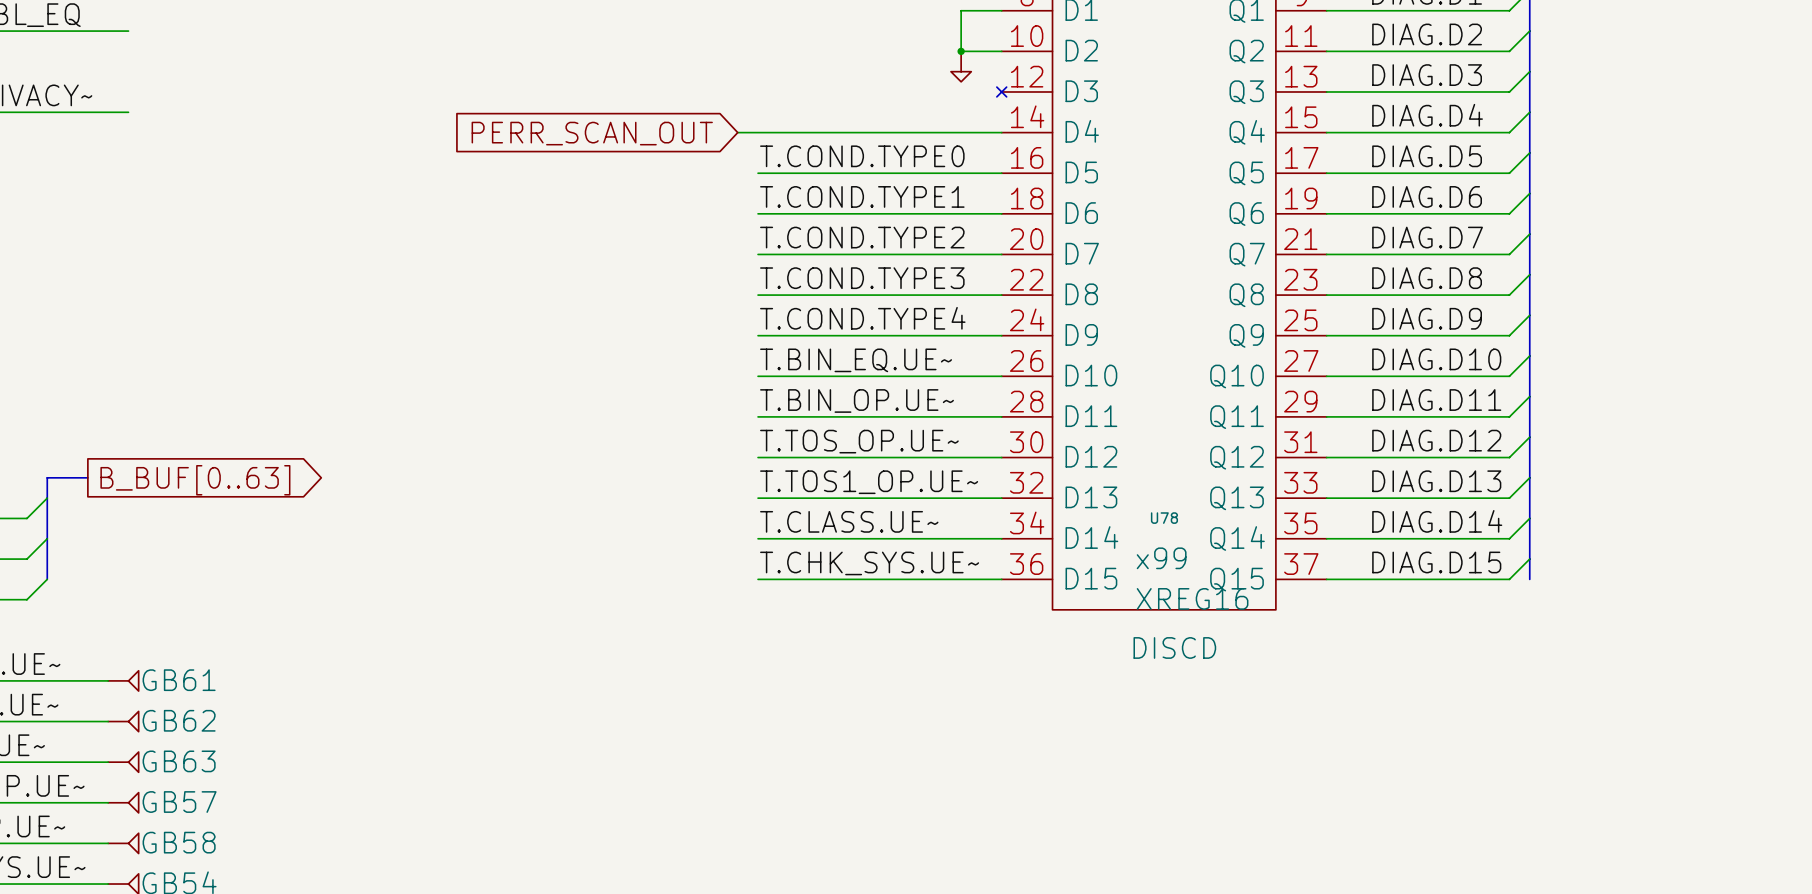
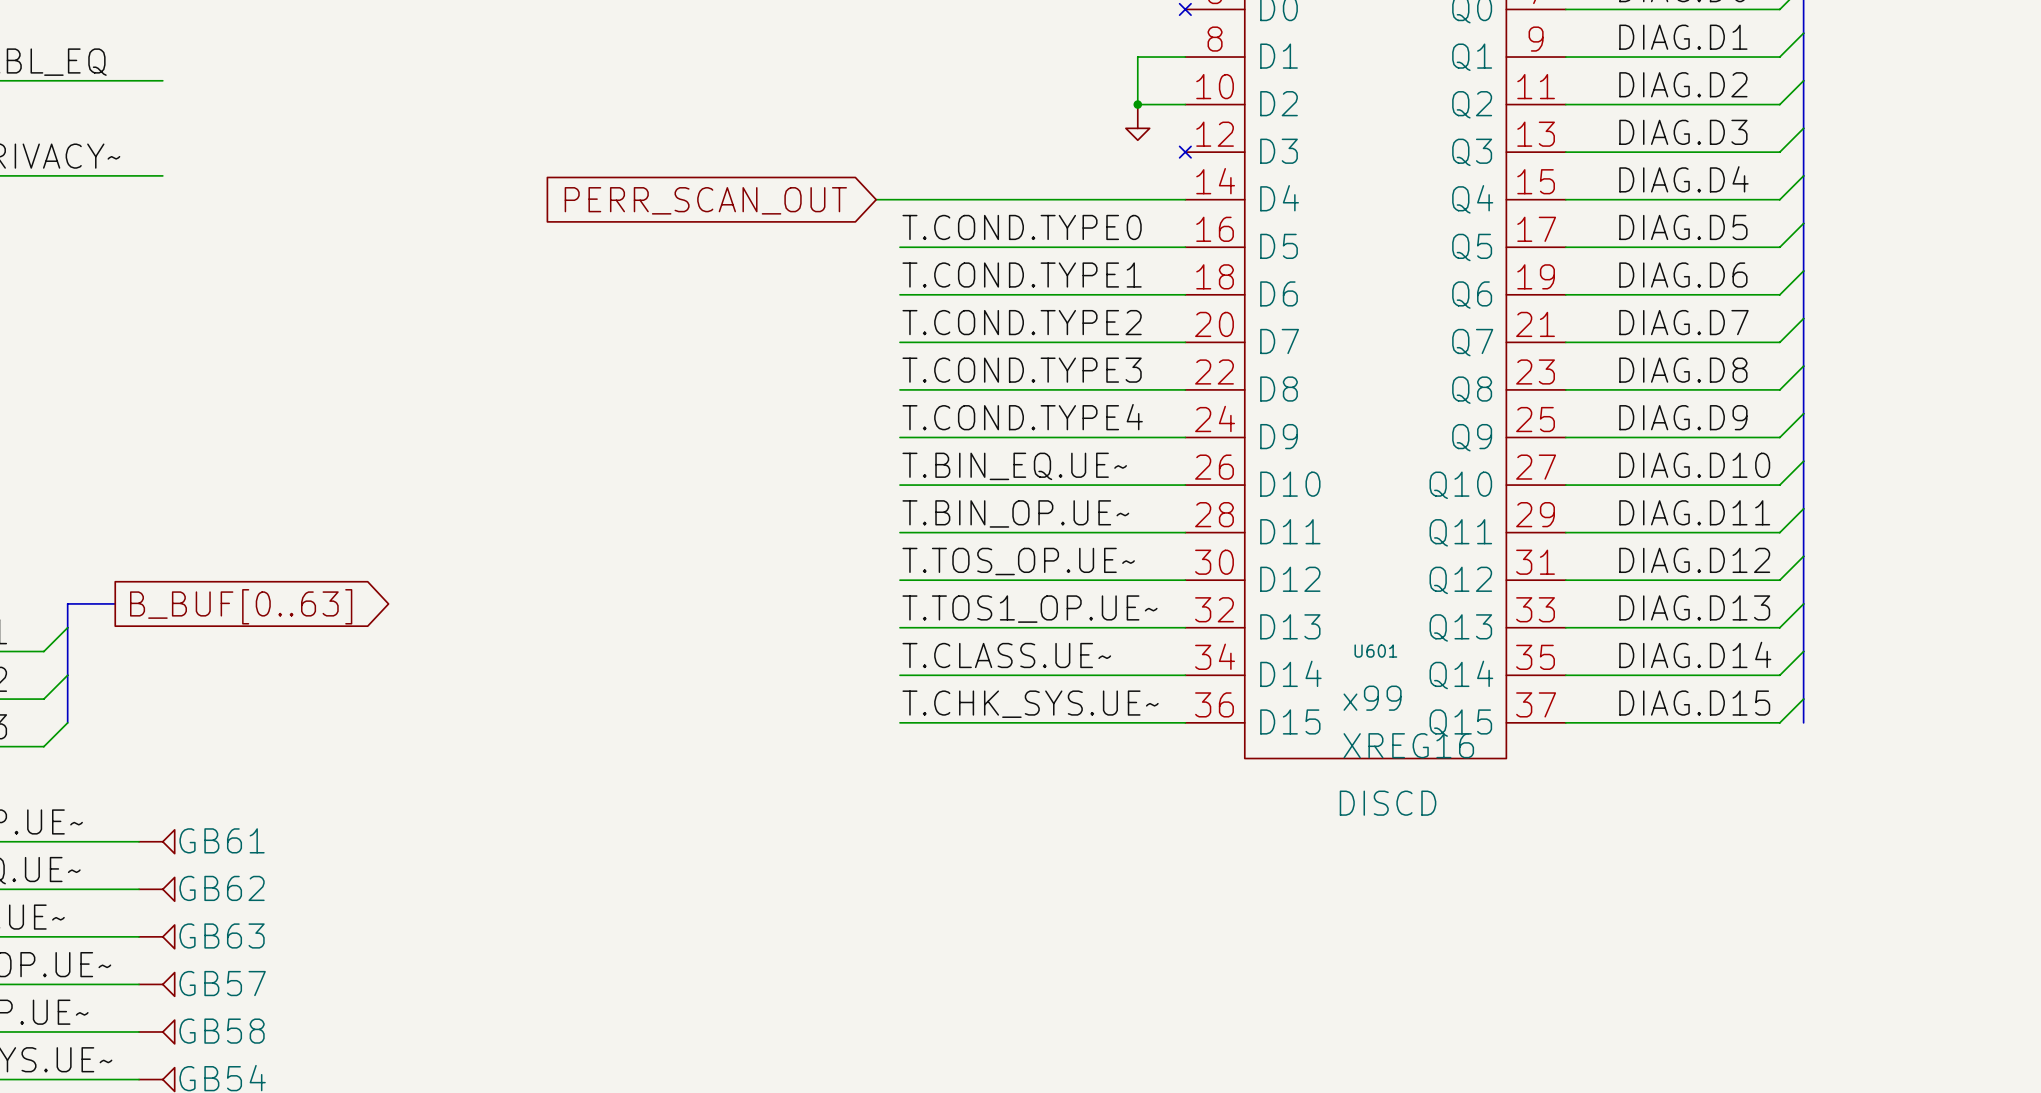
U78 name: U78 (1164, 518) -> U601 (1375, 651)

